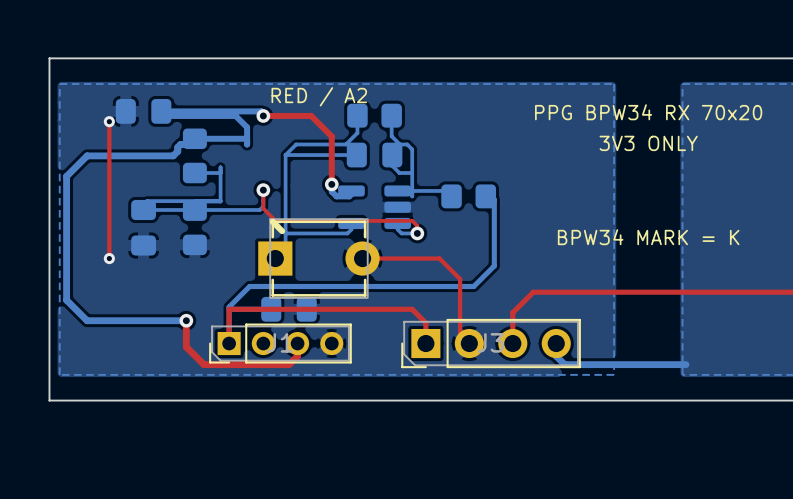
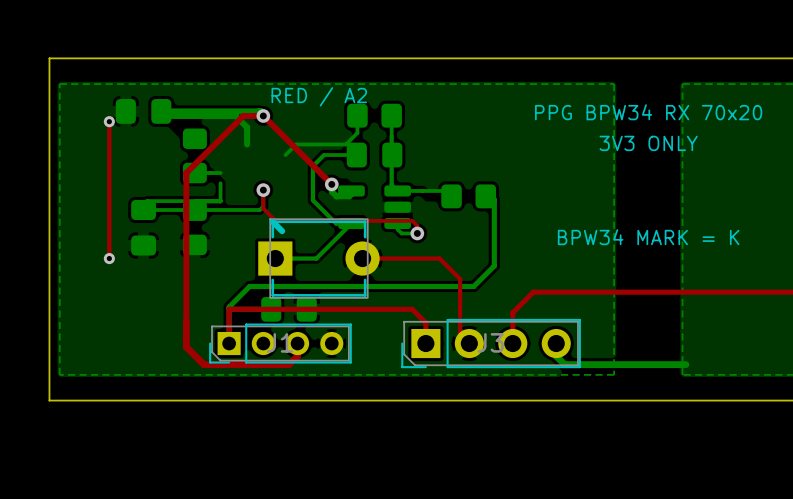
top track: (263, 115) (311, 115) (331, 136) (331, 184) -> (186, 320) (186, 173) (243, 115) (263, 115) (331, 184)
bottom track: (391, 136) (399, 144) (407, 144) (412, 149) (412, 196) -> (391, 136) (391, 184) (397, 190)
bottom track: (247, 138) (194, 138) (192, 144) (180, 144) (173, 155) (87, 155) (66, 176) (66, 300) (87, 320) (186, 320) -> none
bottom track: (324, 155) (285, 155) (285, 259) (282, 263) (277, 263) (275, 258) -> (324, 155) (312, 166) (312, 200) (336, 223) (351, 223) (316, 258) (275, 258)
bottom track: (392, 155) (392, 165) (399, 173) (412, 173) -> none
bottom track: (220, 167) (220, 183) -> none
bottom track: (351, 223) (351, 229) (347, 233) (285, 233) -> none
via: (186, 320) -> none

